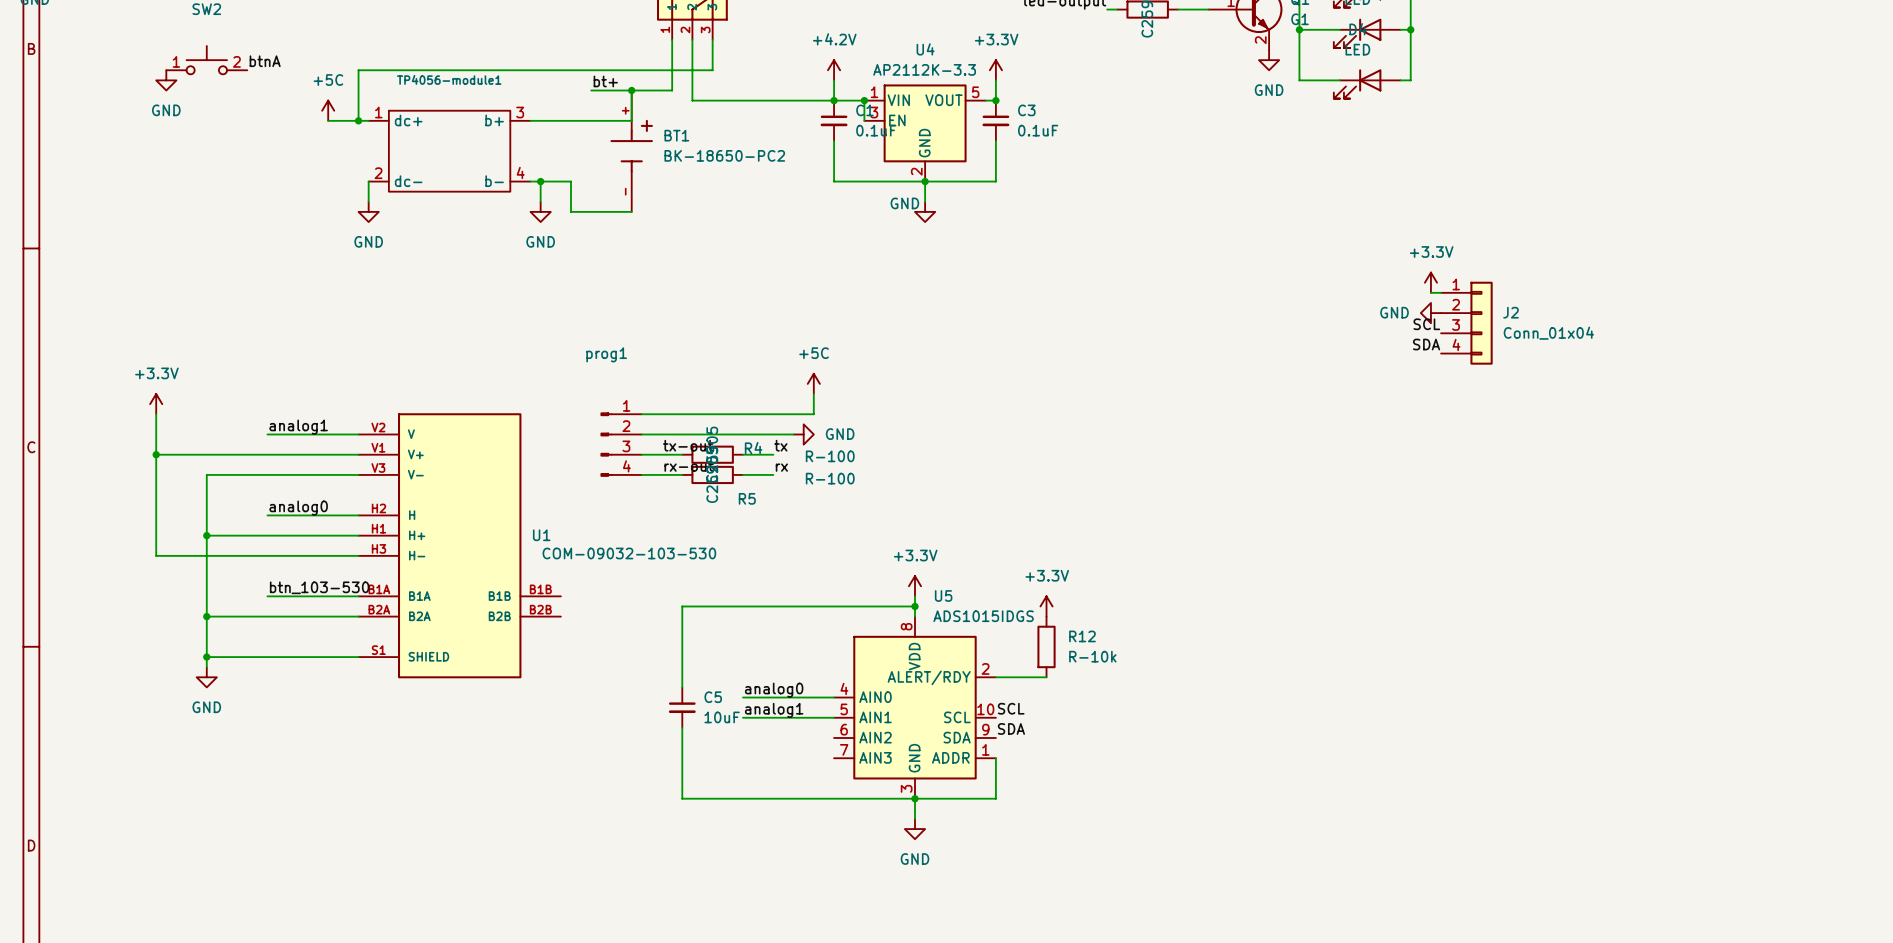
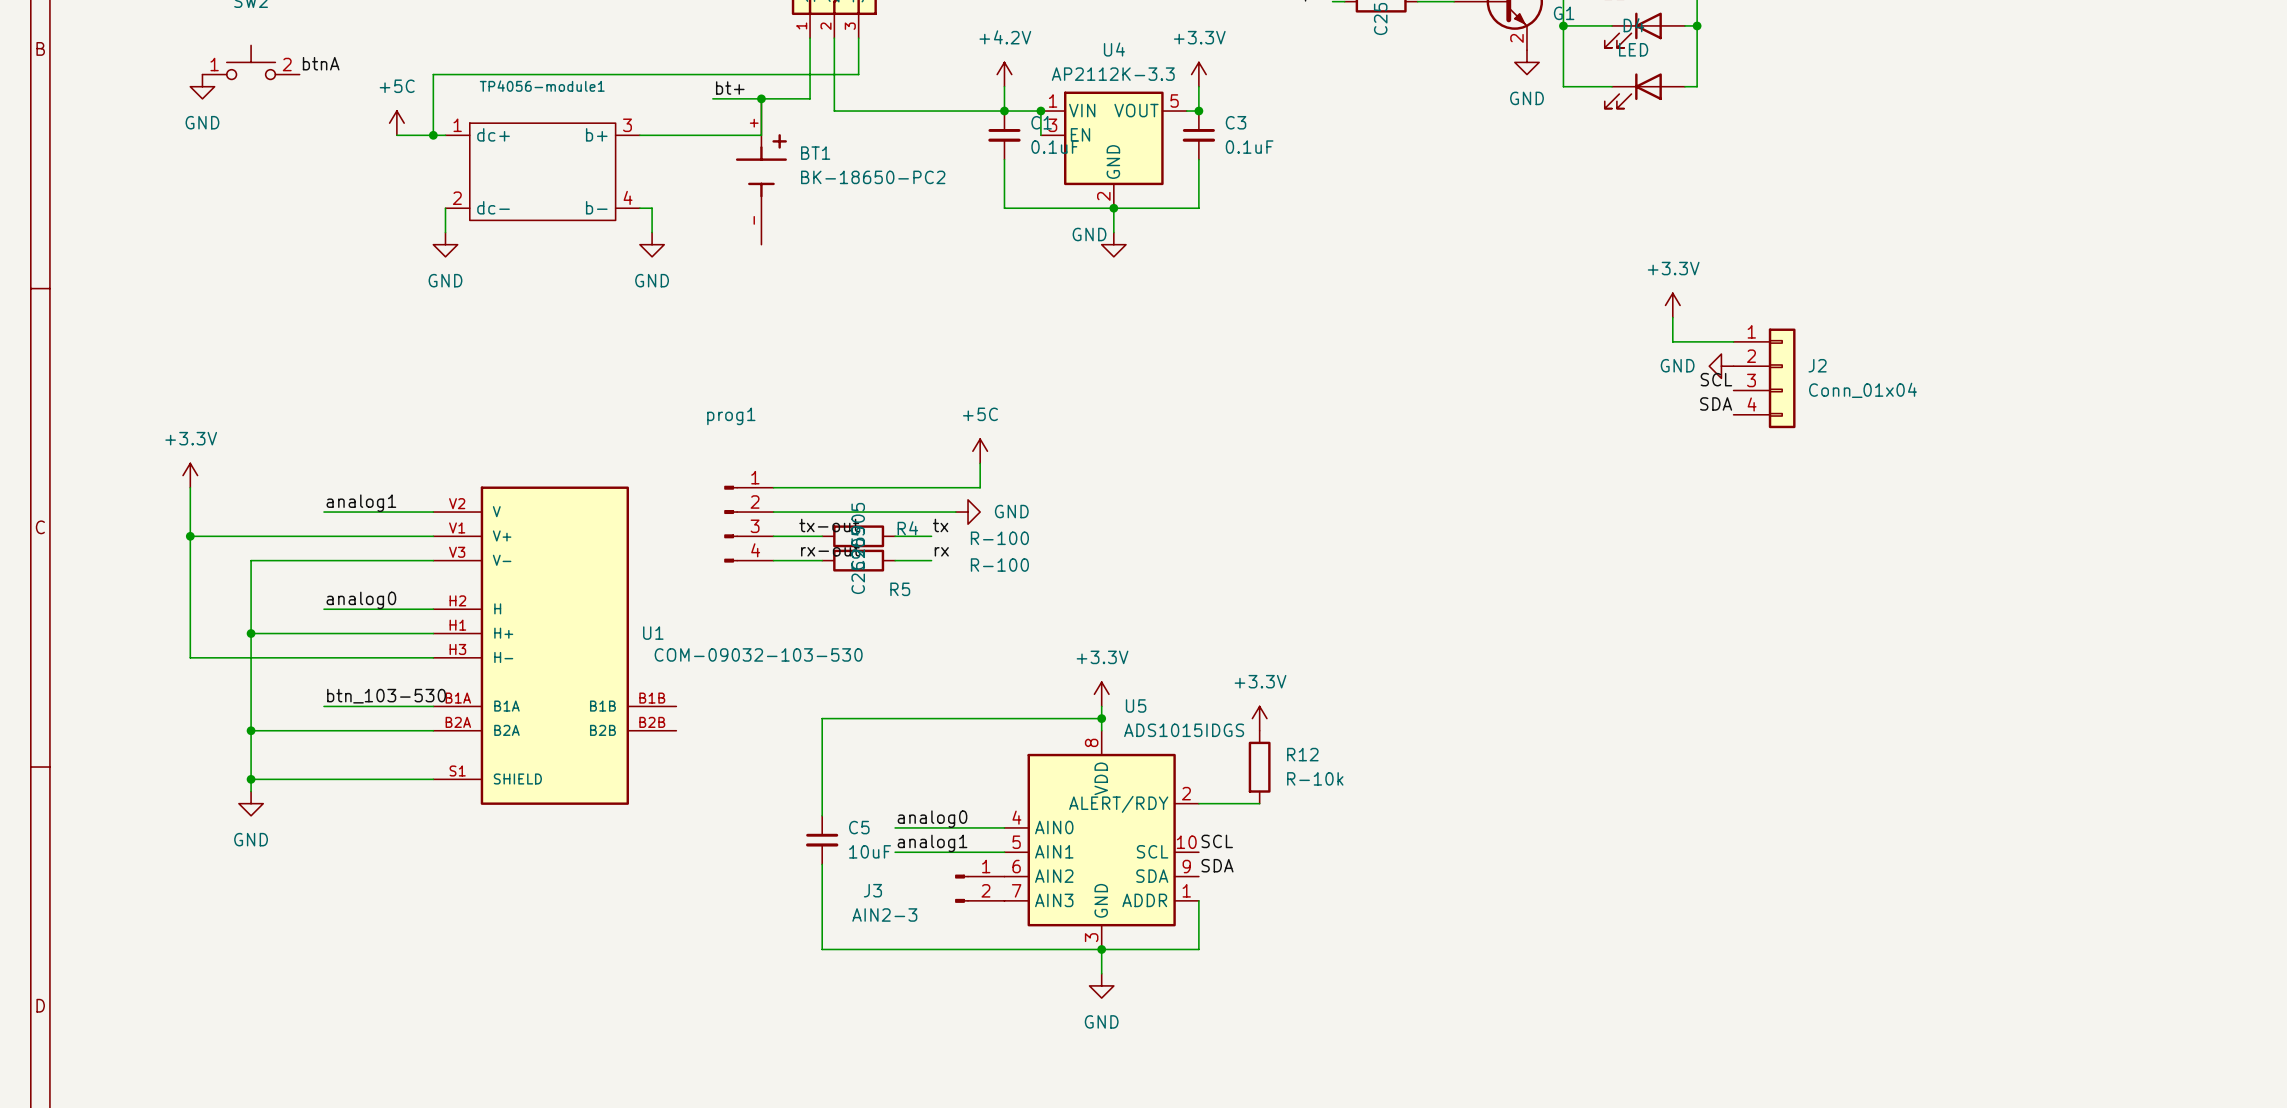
wire: (540, 181) (571, 181) (571, 211) (631, 211) -> none
junction: (540, 181) -> none
wire: none -> (1672, 317) (1672, 341) (1721, 341)
power symbol position: +3.3V (1430, 282) -> +3.3V (1672, 305)
J3: none -> AIN2-3 (979, 888)

